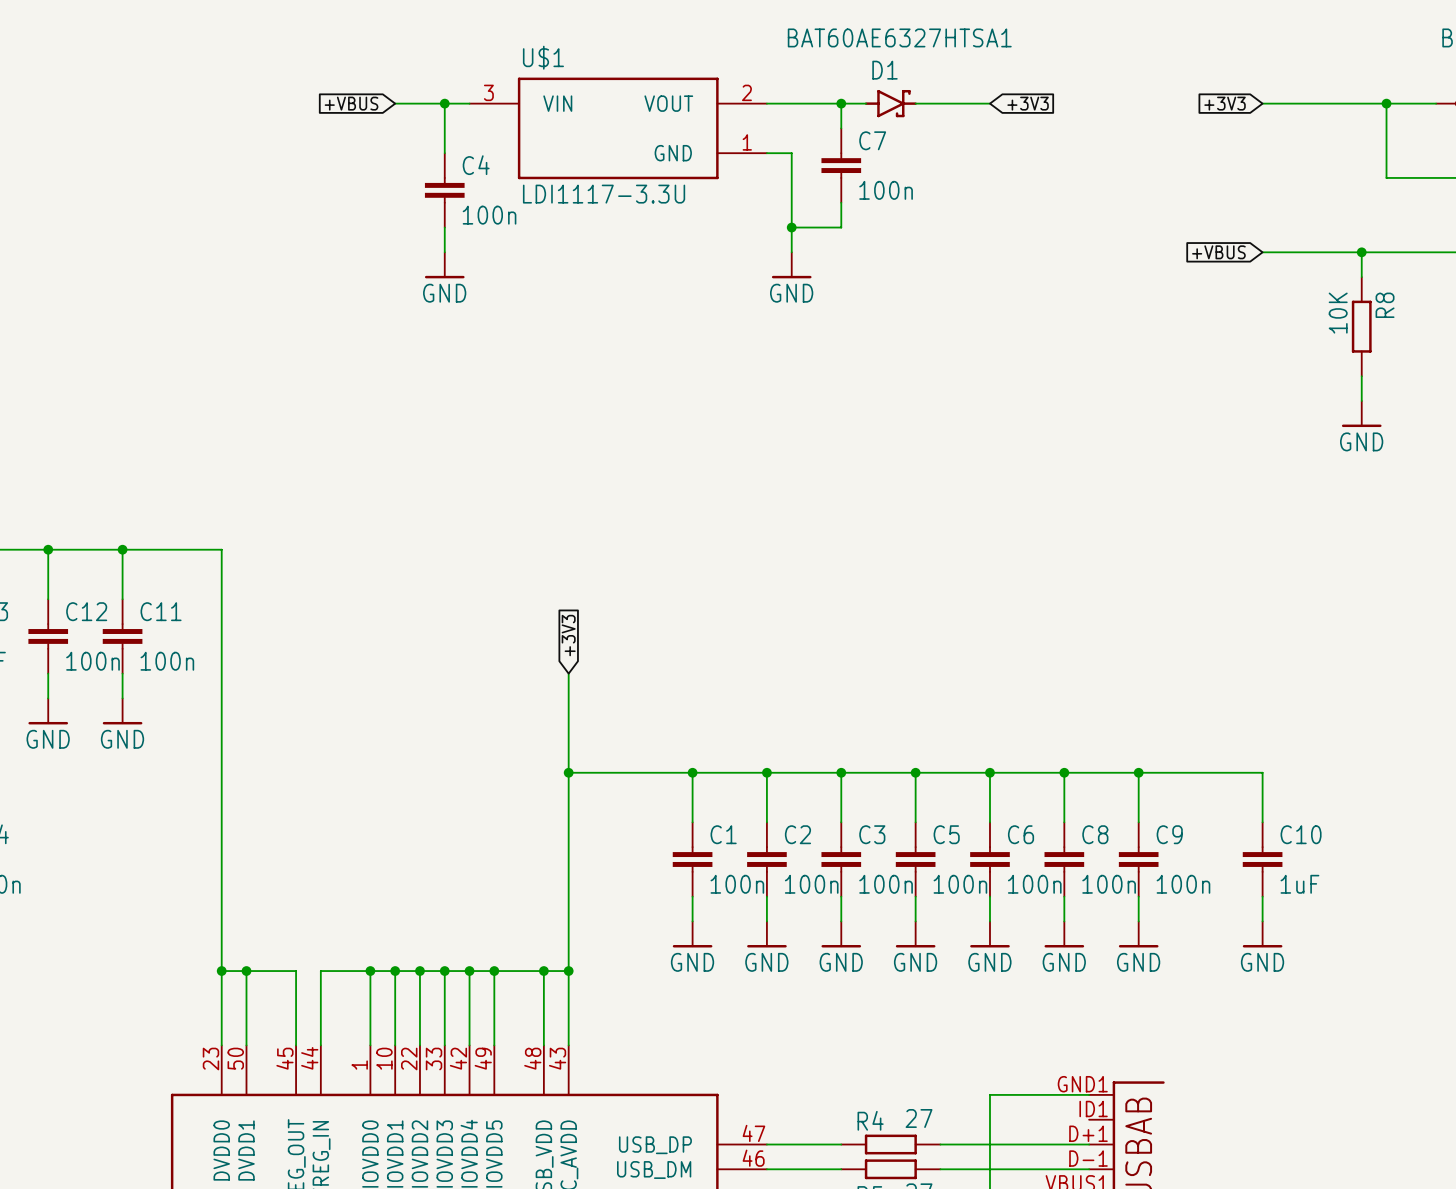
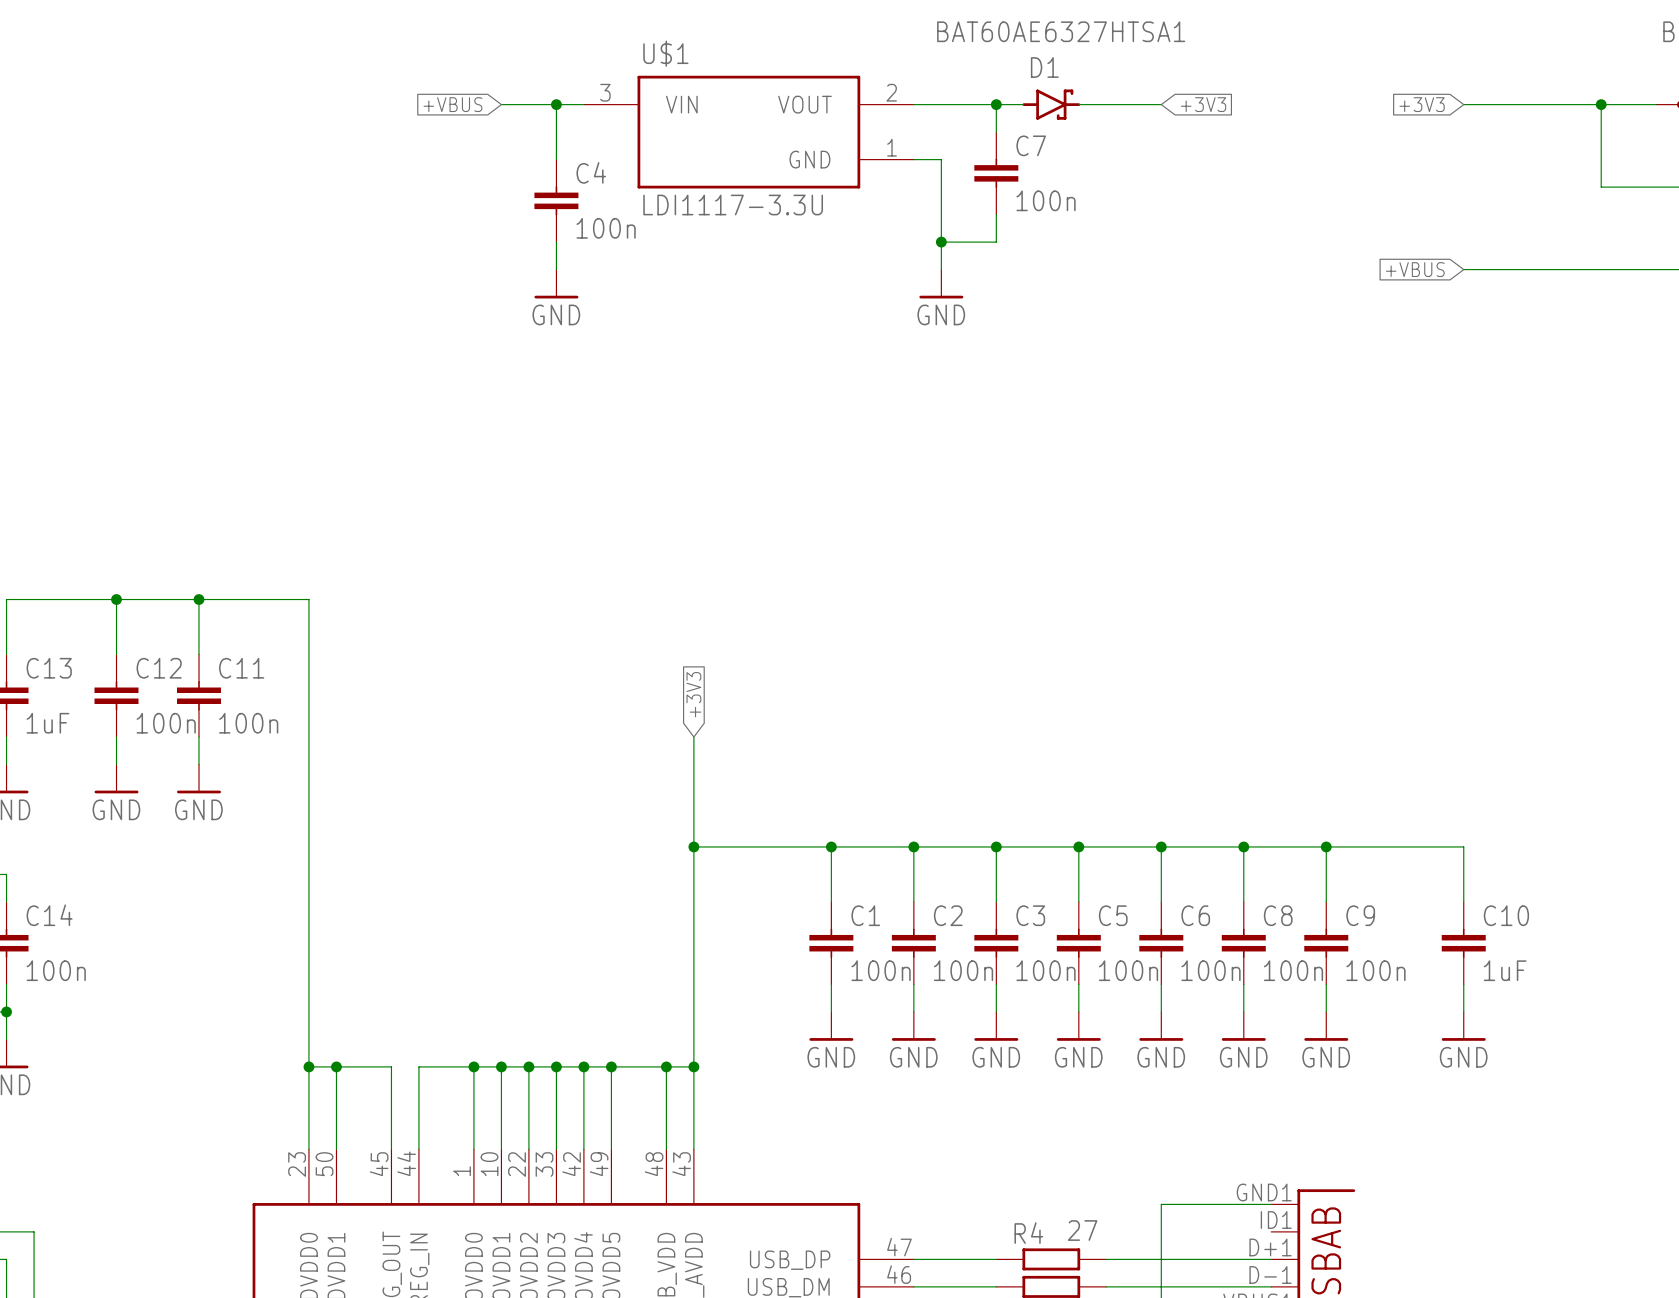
wire: (1361, 252) (1361, 277) -> none
junction: (1361, 252) -> none
R8: 10K (1361, 326) -> none
wire: (1361, 376) (1361, 401) -> none
power symbol: GND (1361, 414) -> none

